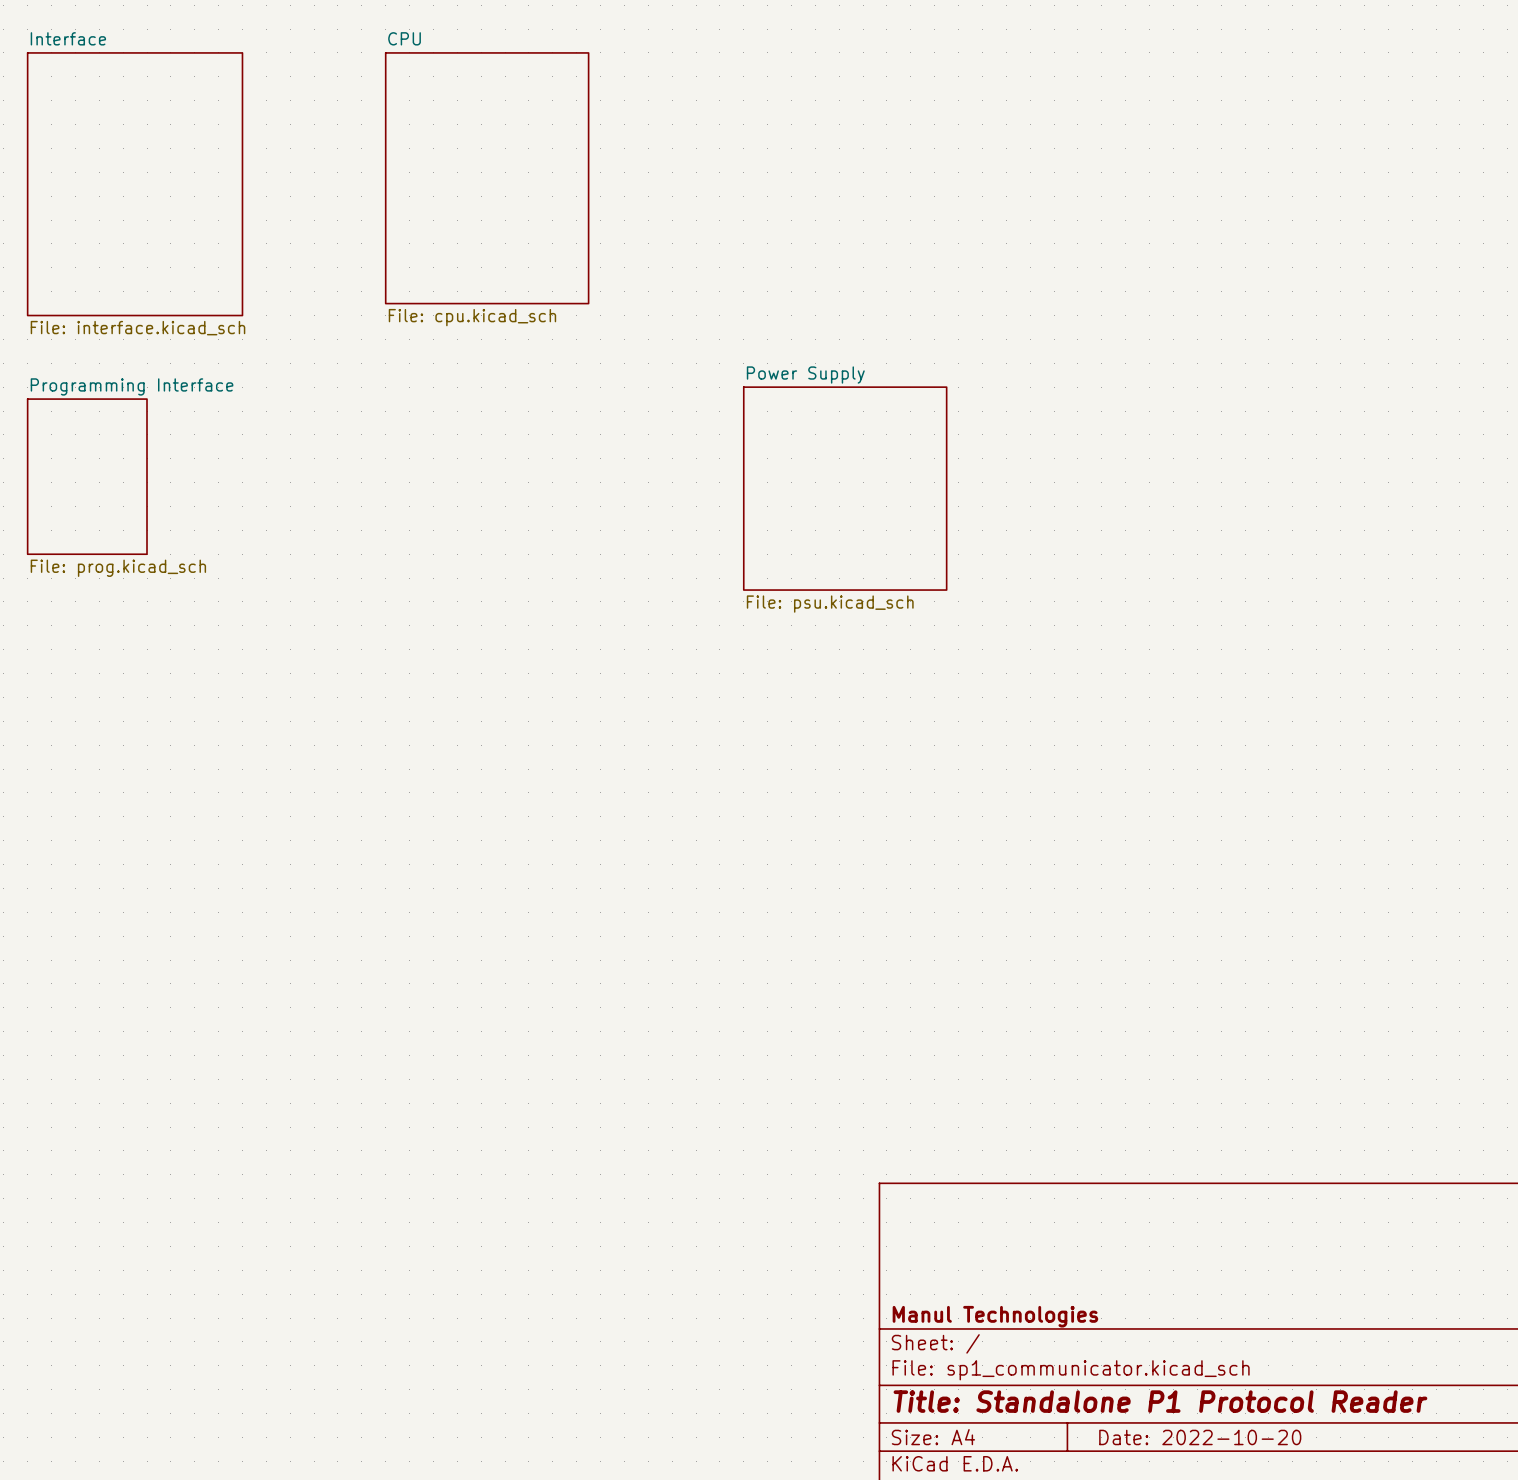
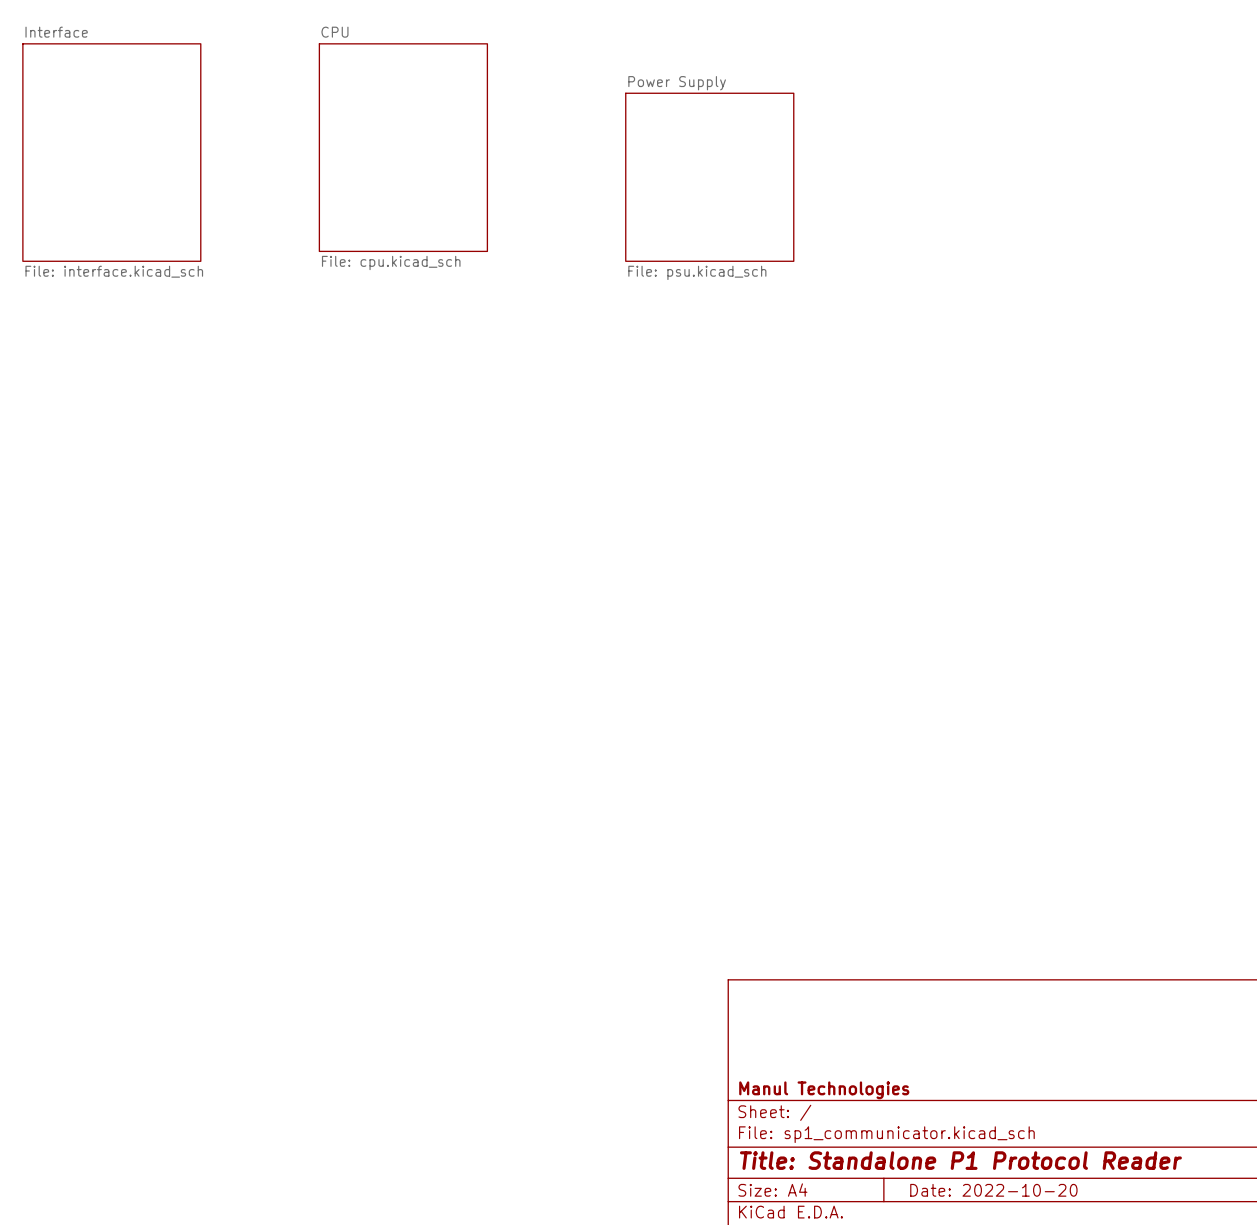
sheet Power Supply: none -> File: psu.kicad_sch (709, 177)
sheet Programming Interface: File: prog.kicad_sch (87, 476) -> none
sheet Power Supply: File: psu.kicad_sch (845, 488) -> none

